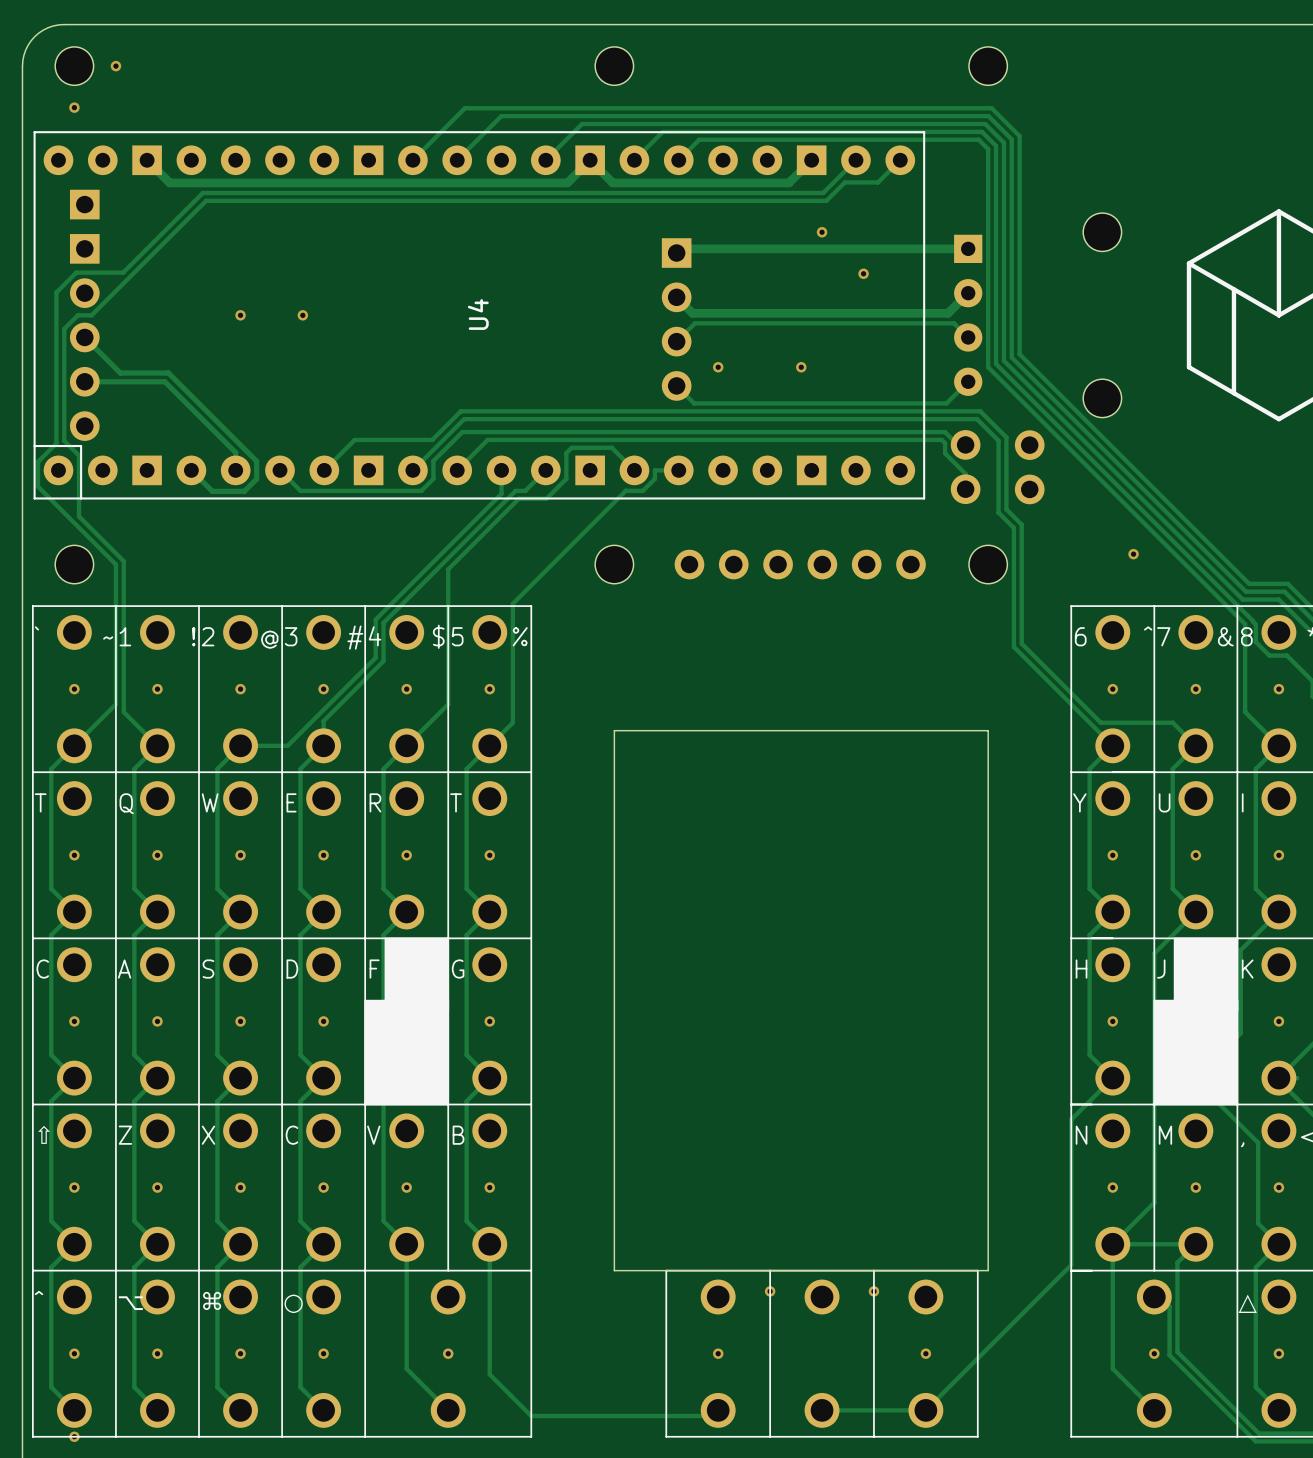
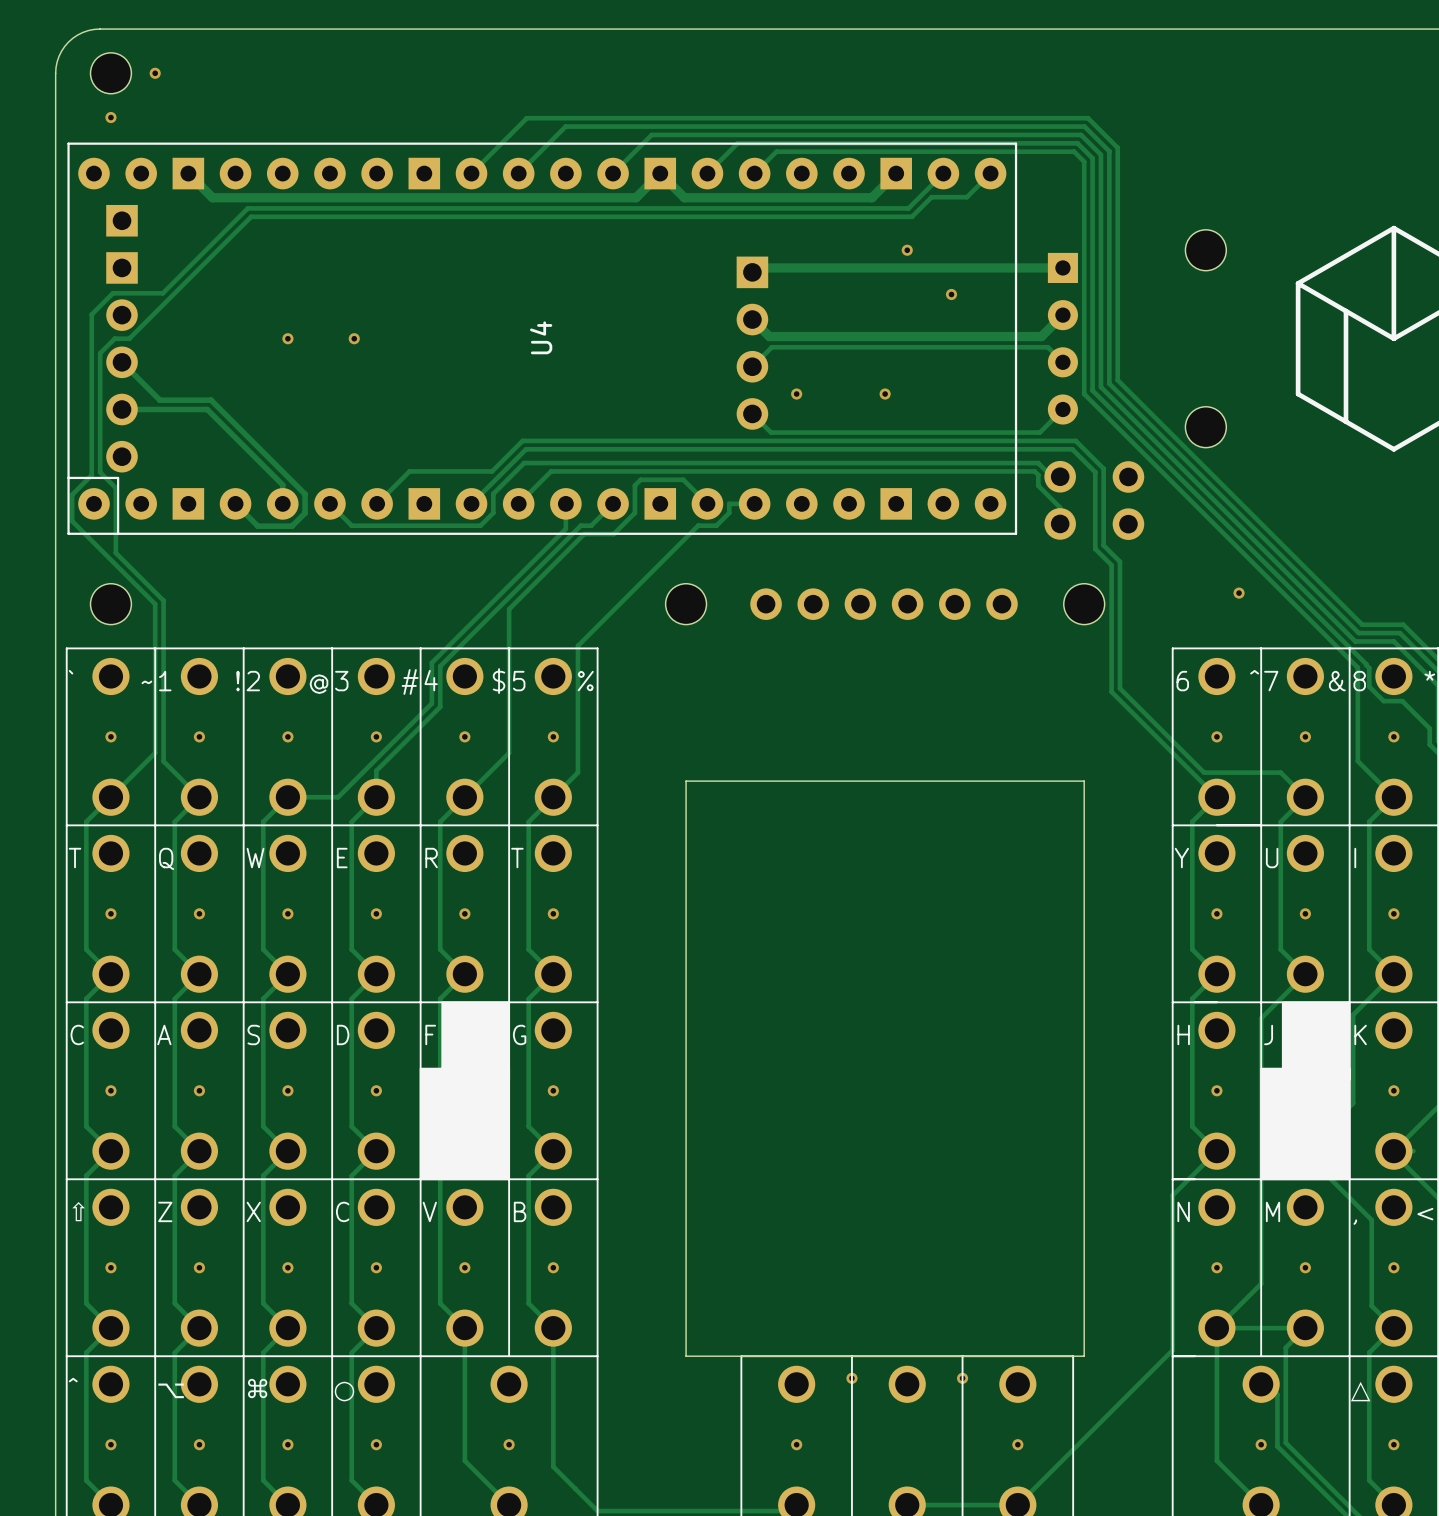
part: (614, 66) -> none
part: (988, 66) -> none

